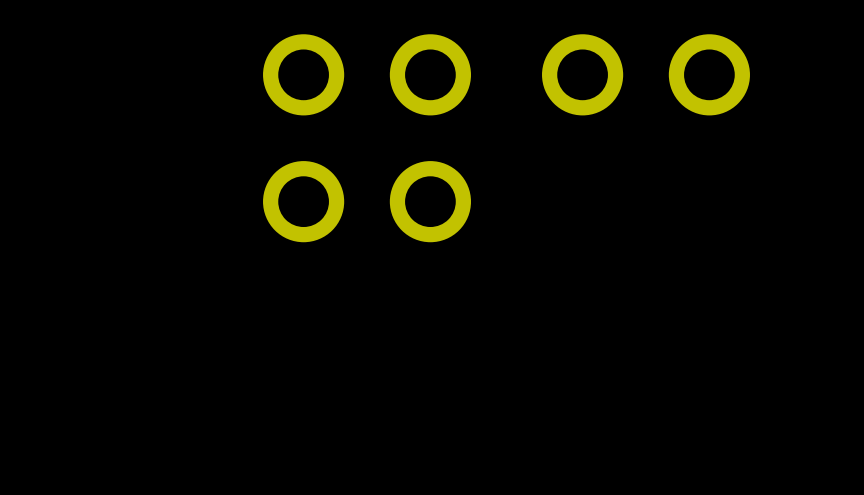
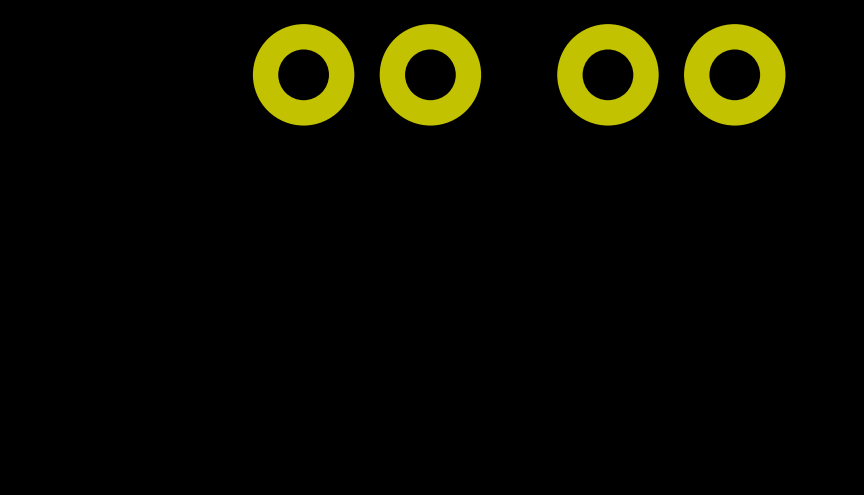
part footprint: [263, 34, 472, 116] -> [252, 24, 482, 126]
part footprint: [542, 34, 750, 116] -> [557, 24, 786, 126]
part: (367, 201) -> none

